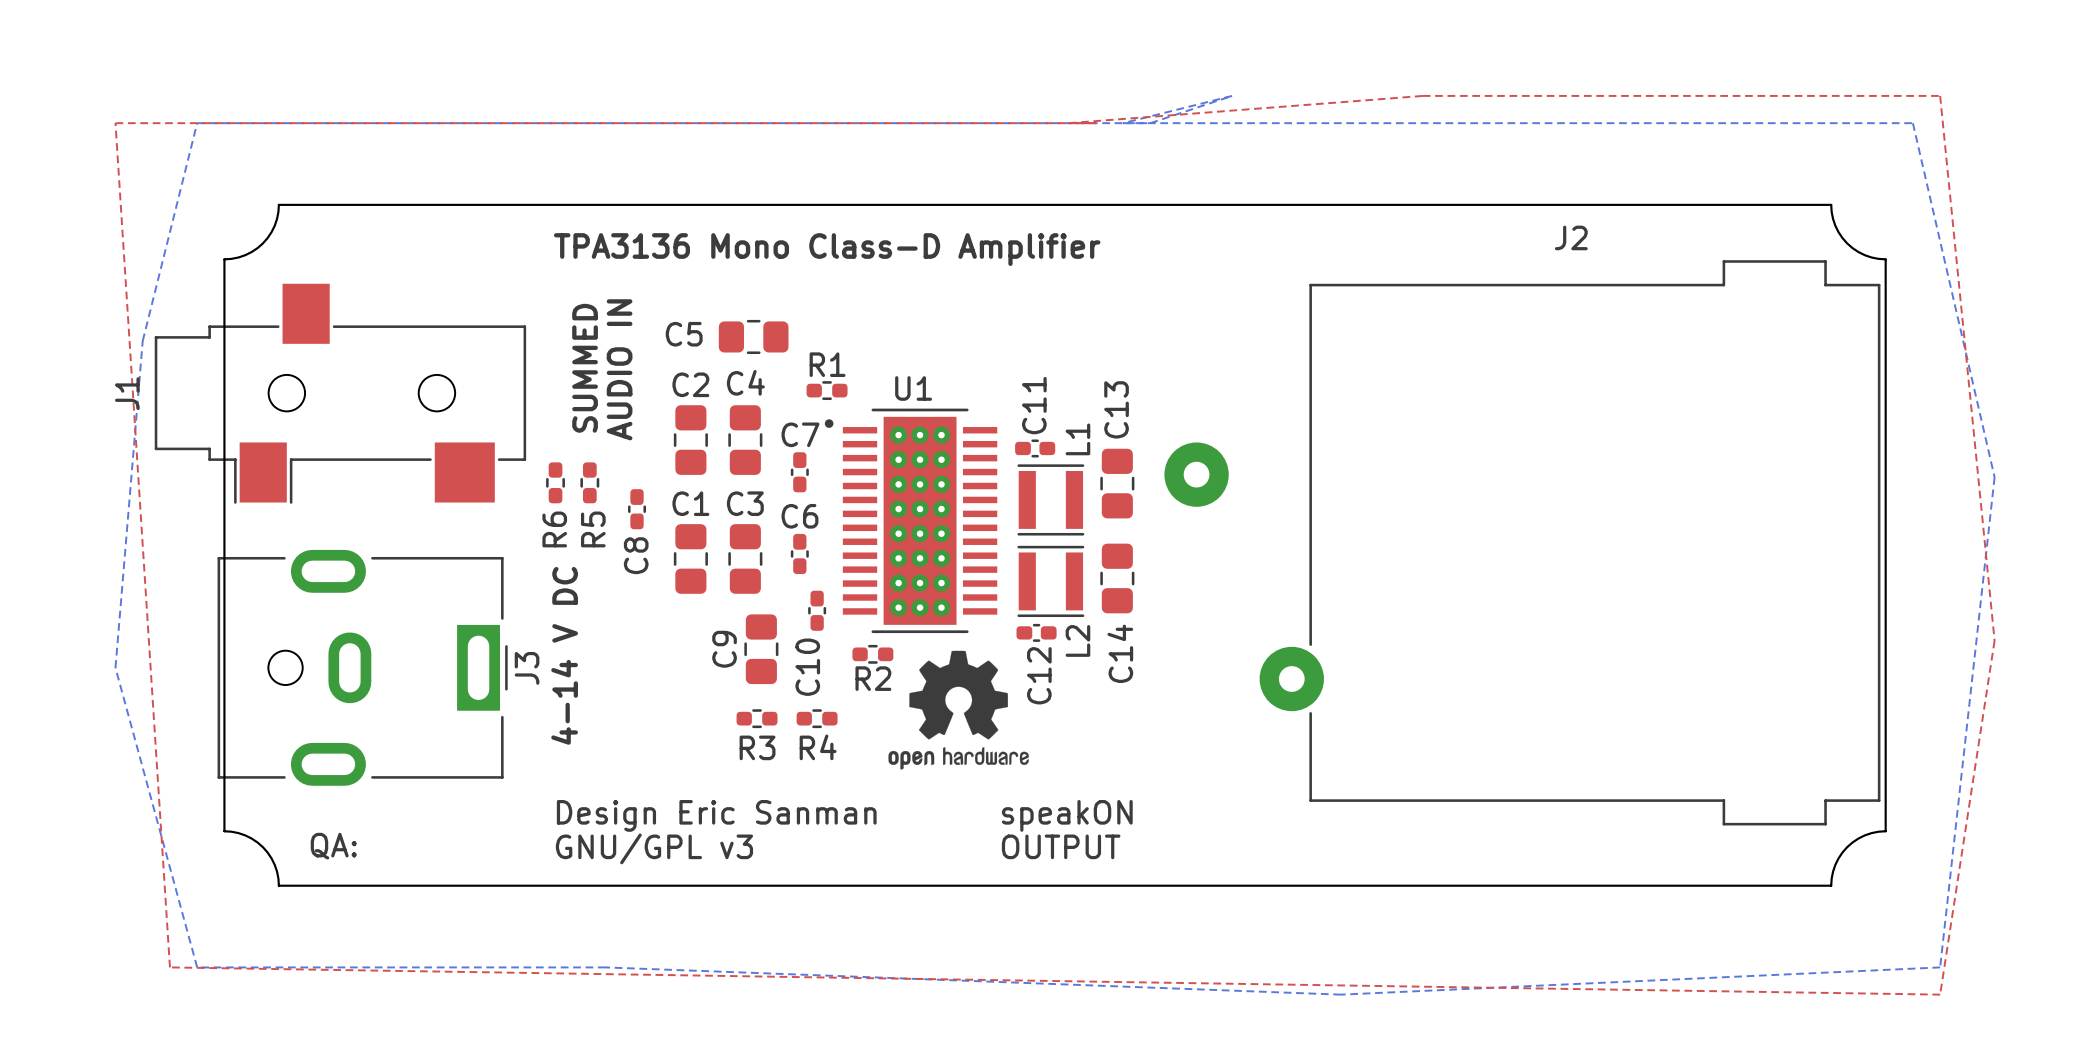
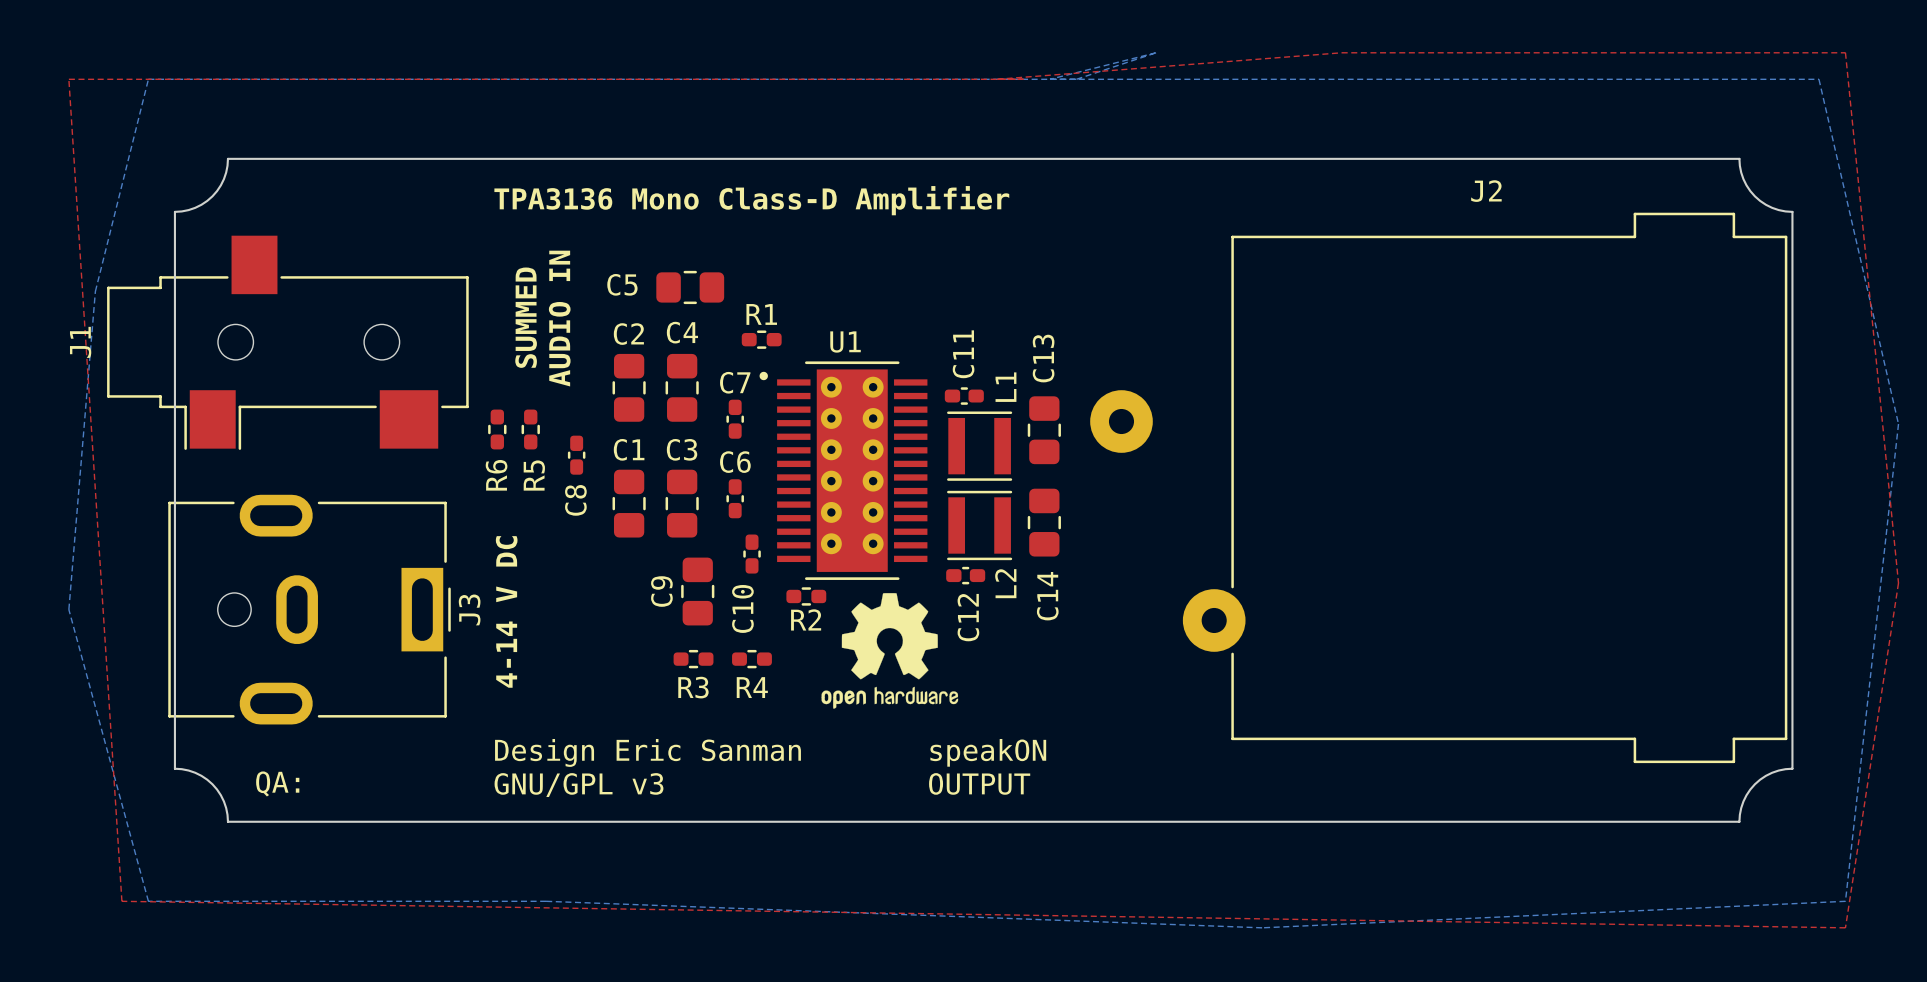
U1 footprint: [824, 408, 998, 634] -> [759, 361, 928, 580]

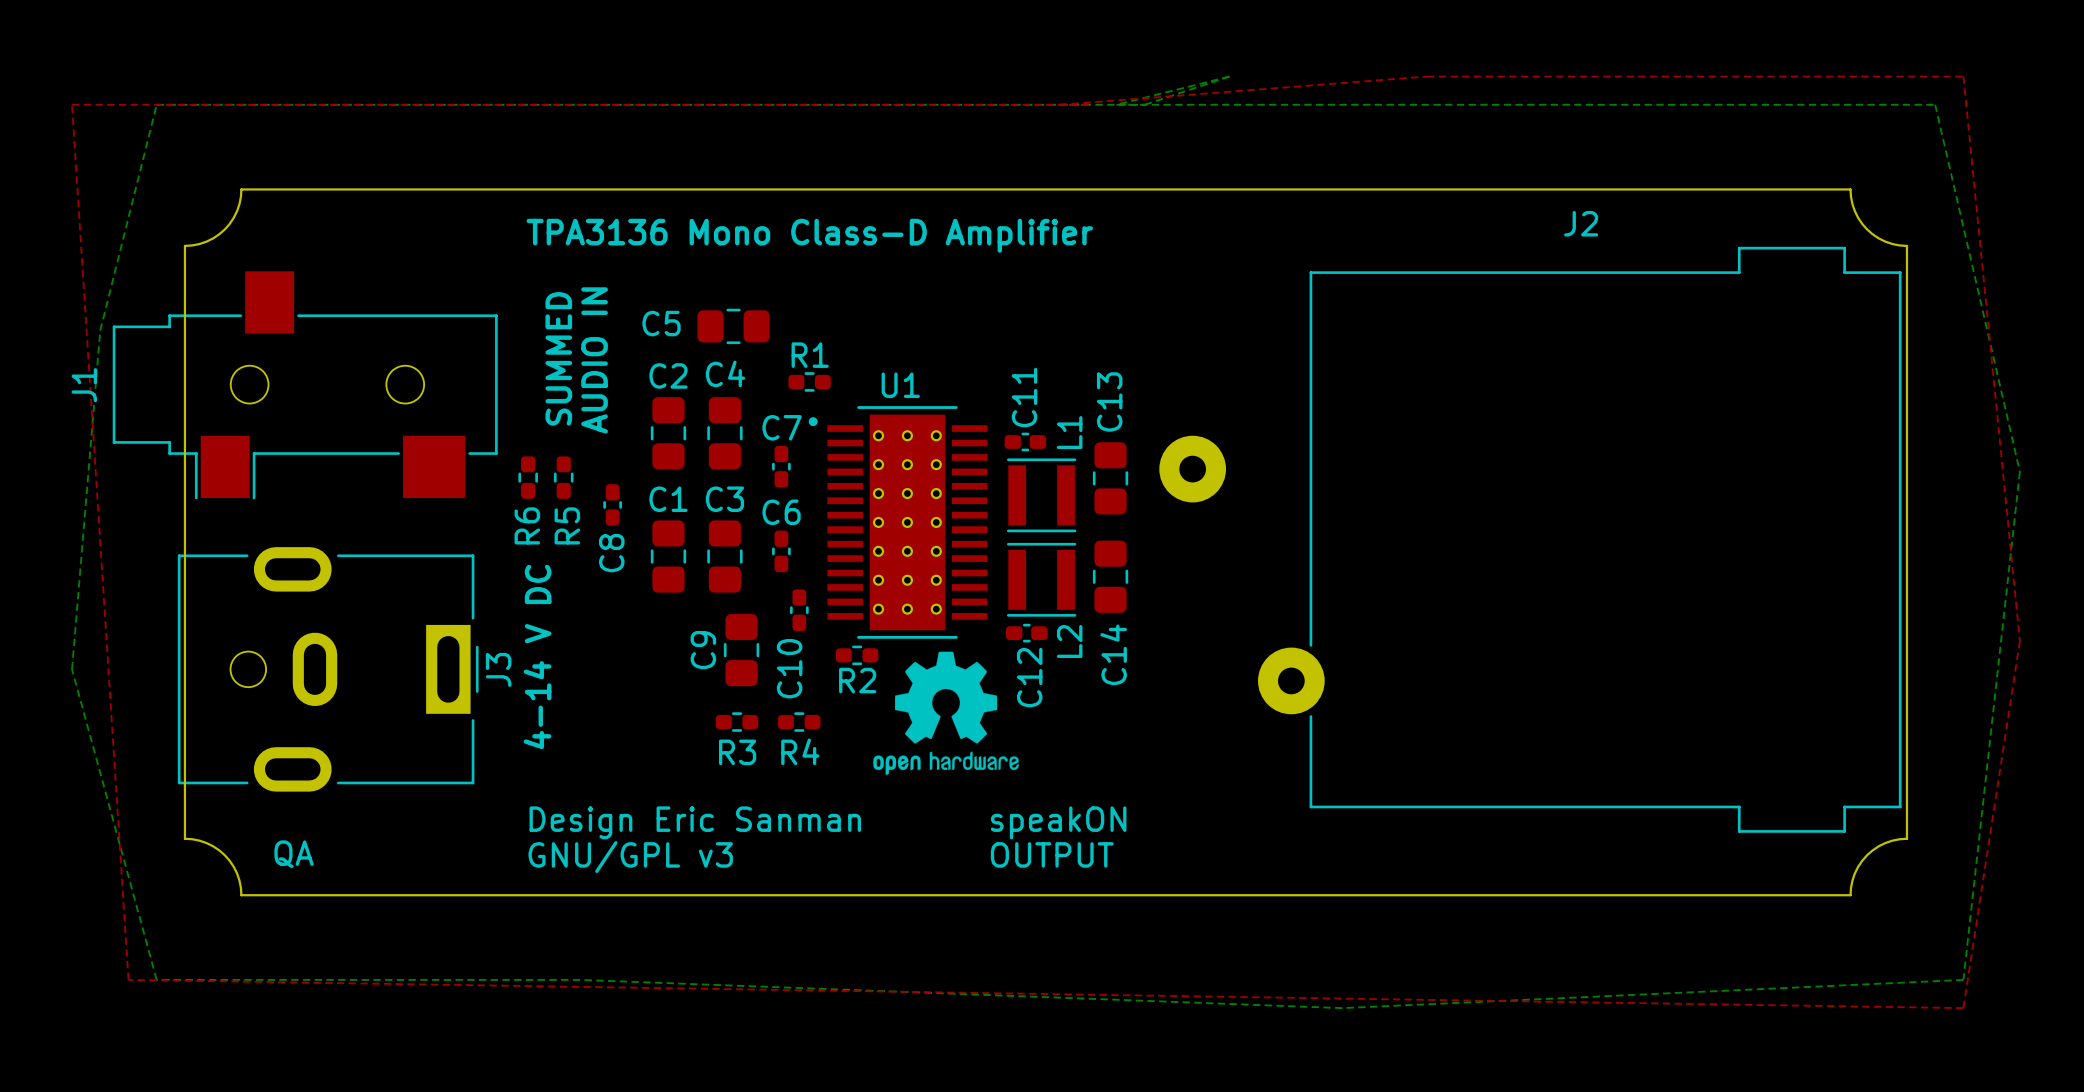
U1 footprint: [759, 361, 928, 580] -> [808, 406, 988, 639]
text: QA: (277, 783) -> QA (294, 854)

